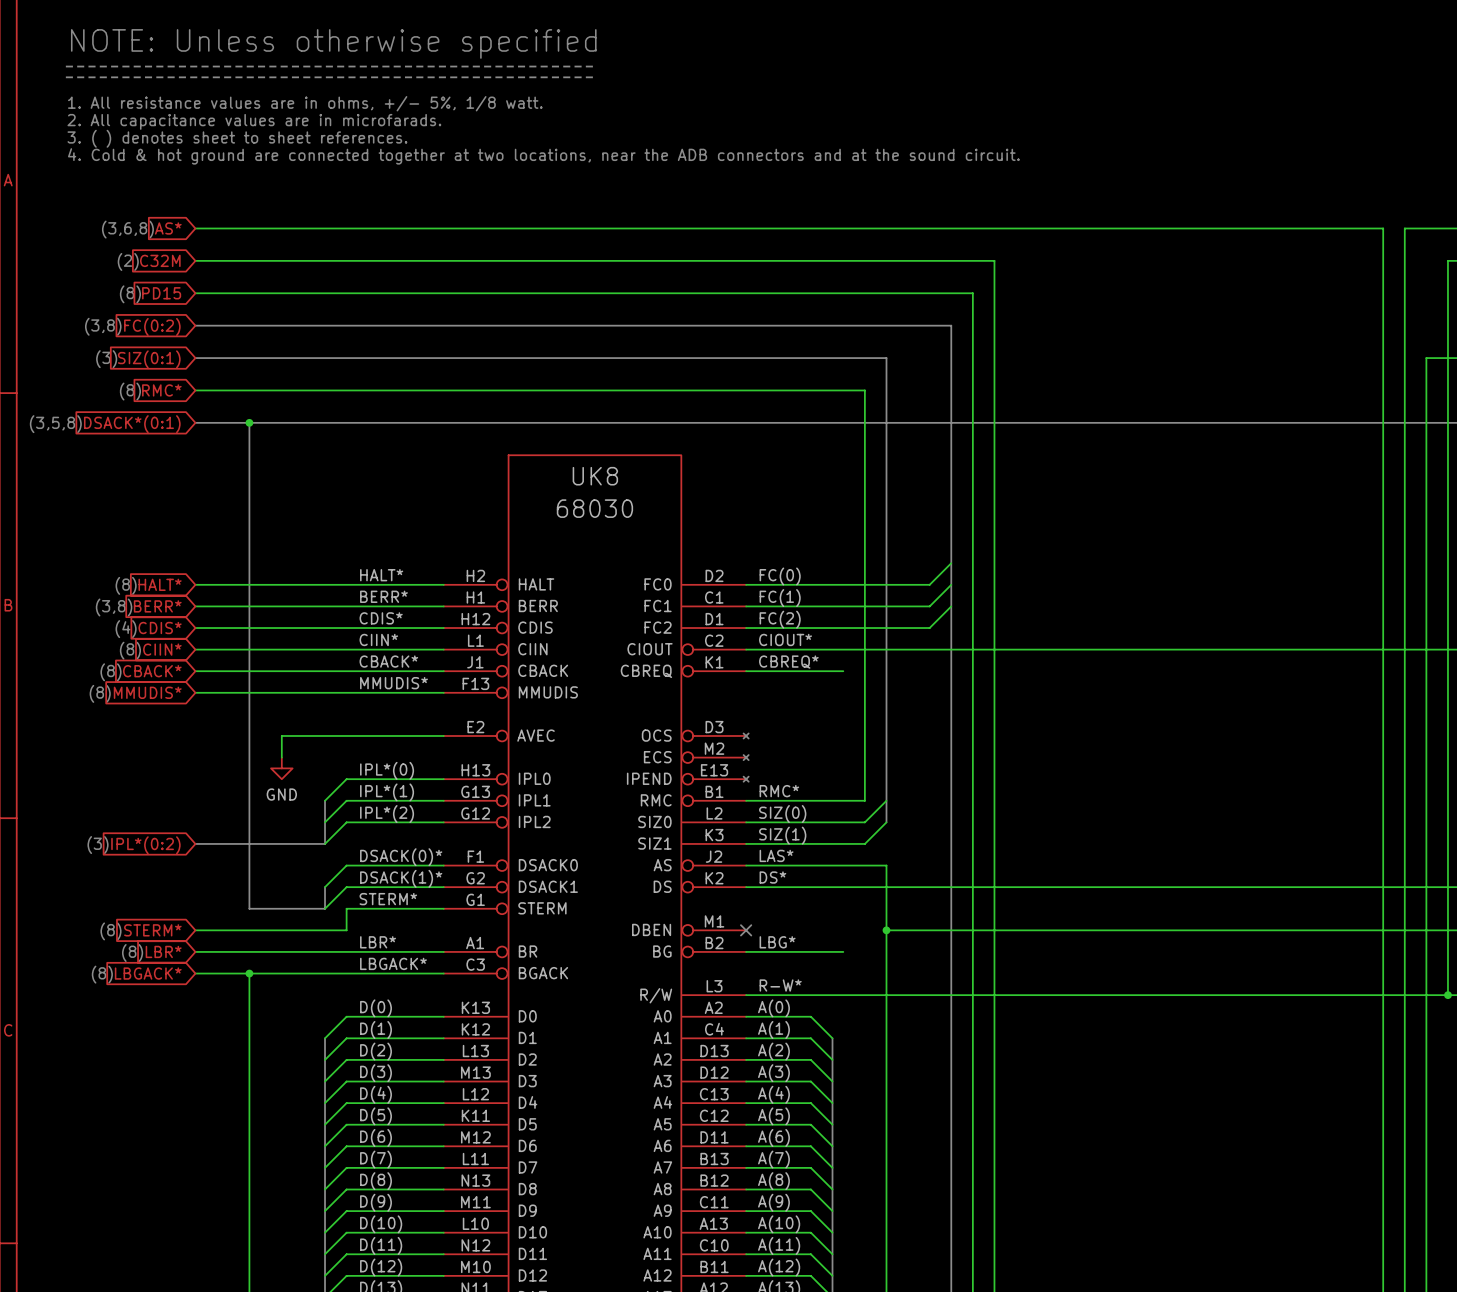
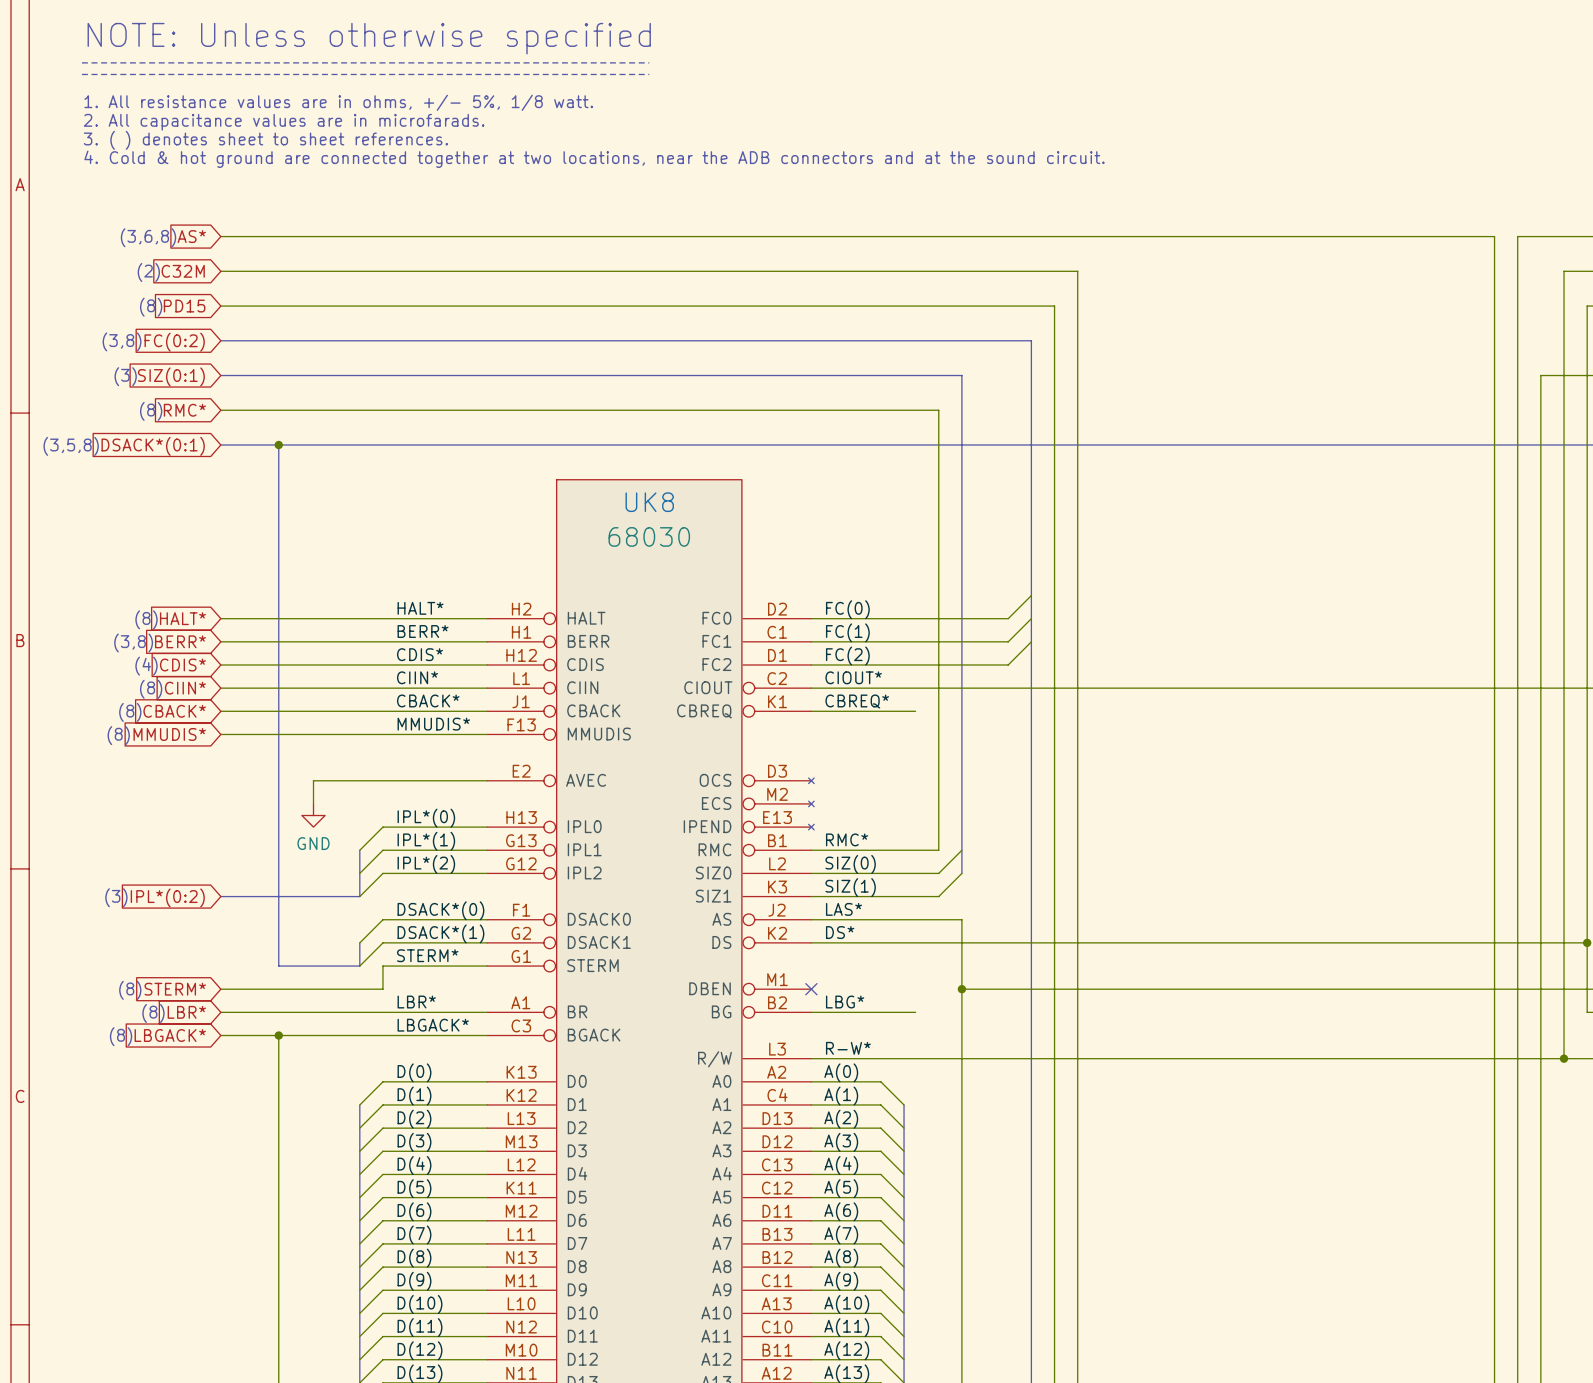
label: DSACK(0)* (401, 857) -> DSACK*(0) (440, 910)
label: DSACK(1)* (401, 878) -> DSACK*(1) (440, 933)

